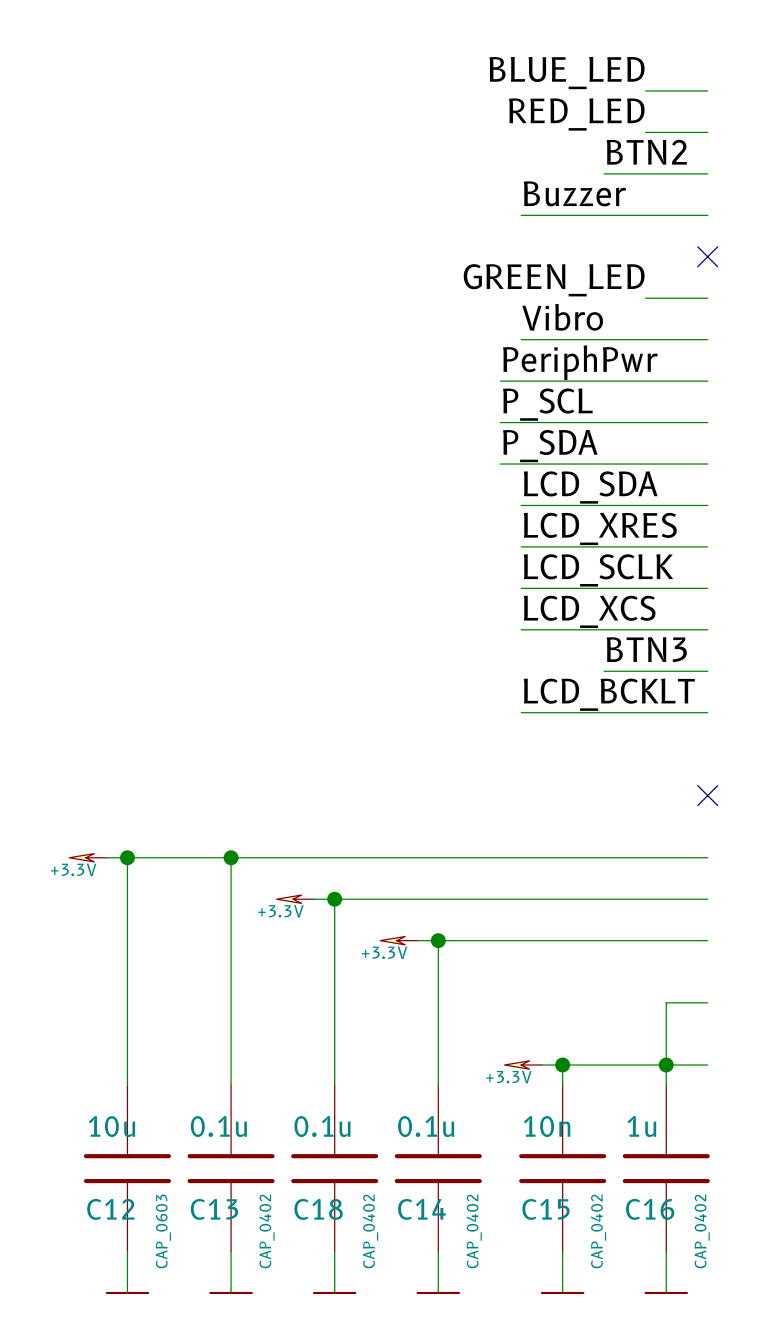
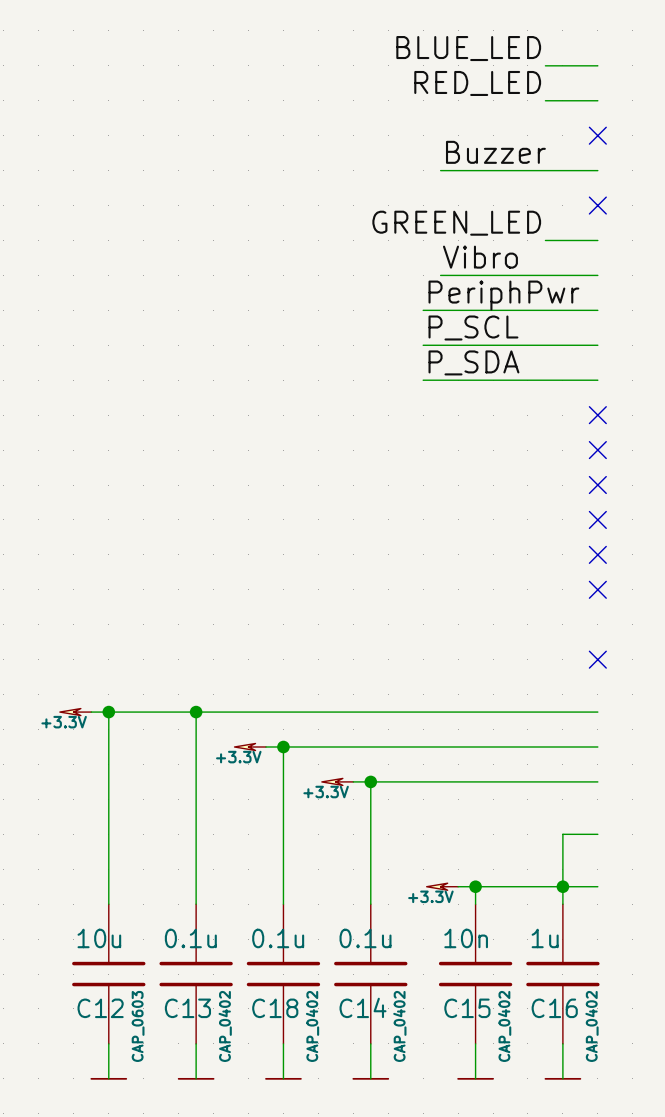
label: BTN2 (646, 152) -> none
wire: (604, 173) (707, 173) -> none
no-connect mark: none -> (597, 135)
label: LCD_SDA (590, 487) -> none
wire: (521, 505) (707, 505) -> none
no-connect mark: none -> (597, 415)
label: LCD_XRES (600, 528) -> none
wire: (521, 546) (707, 546) -> none
no-connect mark: none -> (597, 450)
label: LCD_SCLK (598, 570) -> none
wire: (521, 588) (707, 588) -> none
no-connect mark: none -> (597, 485)
label: LCD_XCS (589, 611) -> none
wire: (521, 629) (707, 629) -> none
no-connect mark: none -> (597, 519)
label: BTN3 (646, 649) -> none
wire: (604, 671) (707, 671) -> none
no-connect mark: none -> (597, 554)
label: LCD_BCKLT (609, 694) -> none
wire: (521, 712) (707, 712) -> none
no-connect mark: none -> (597, 589)

